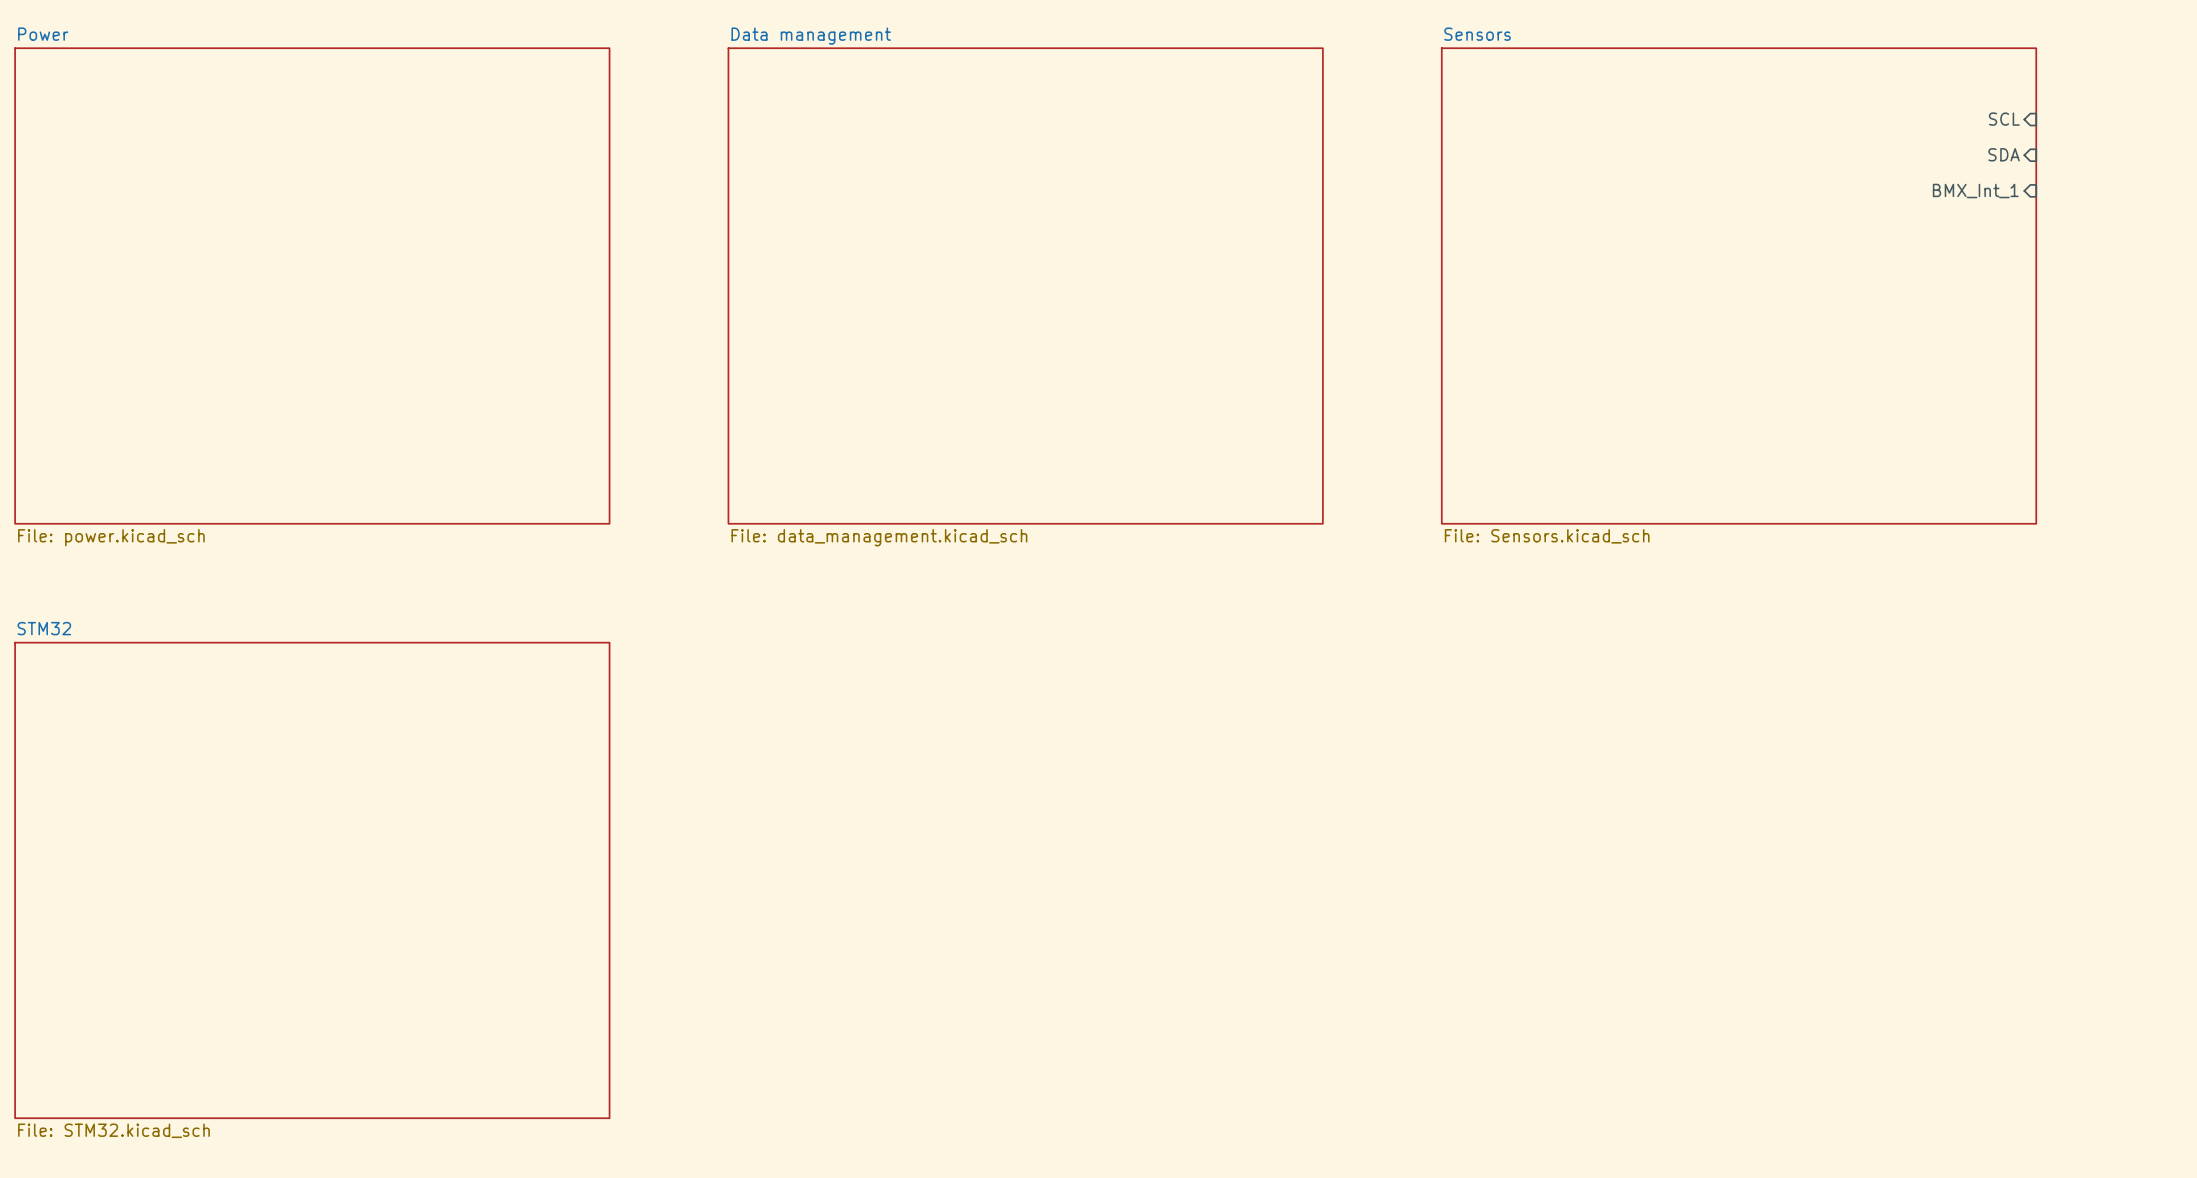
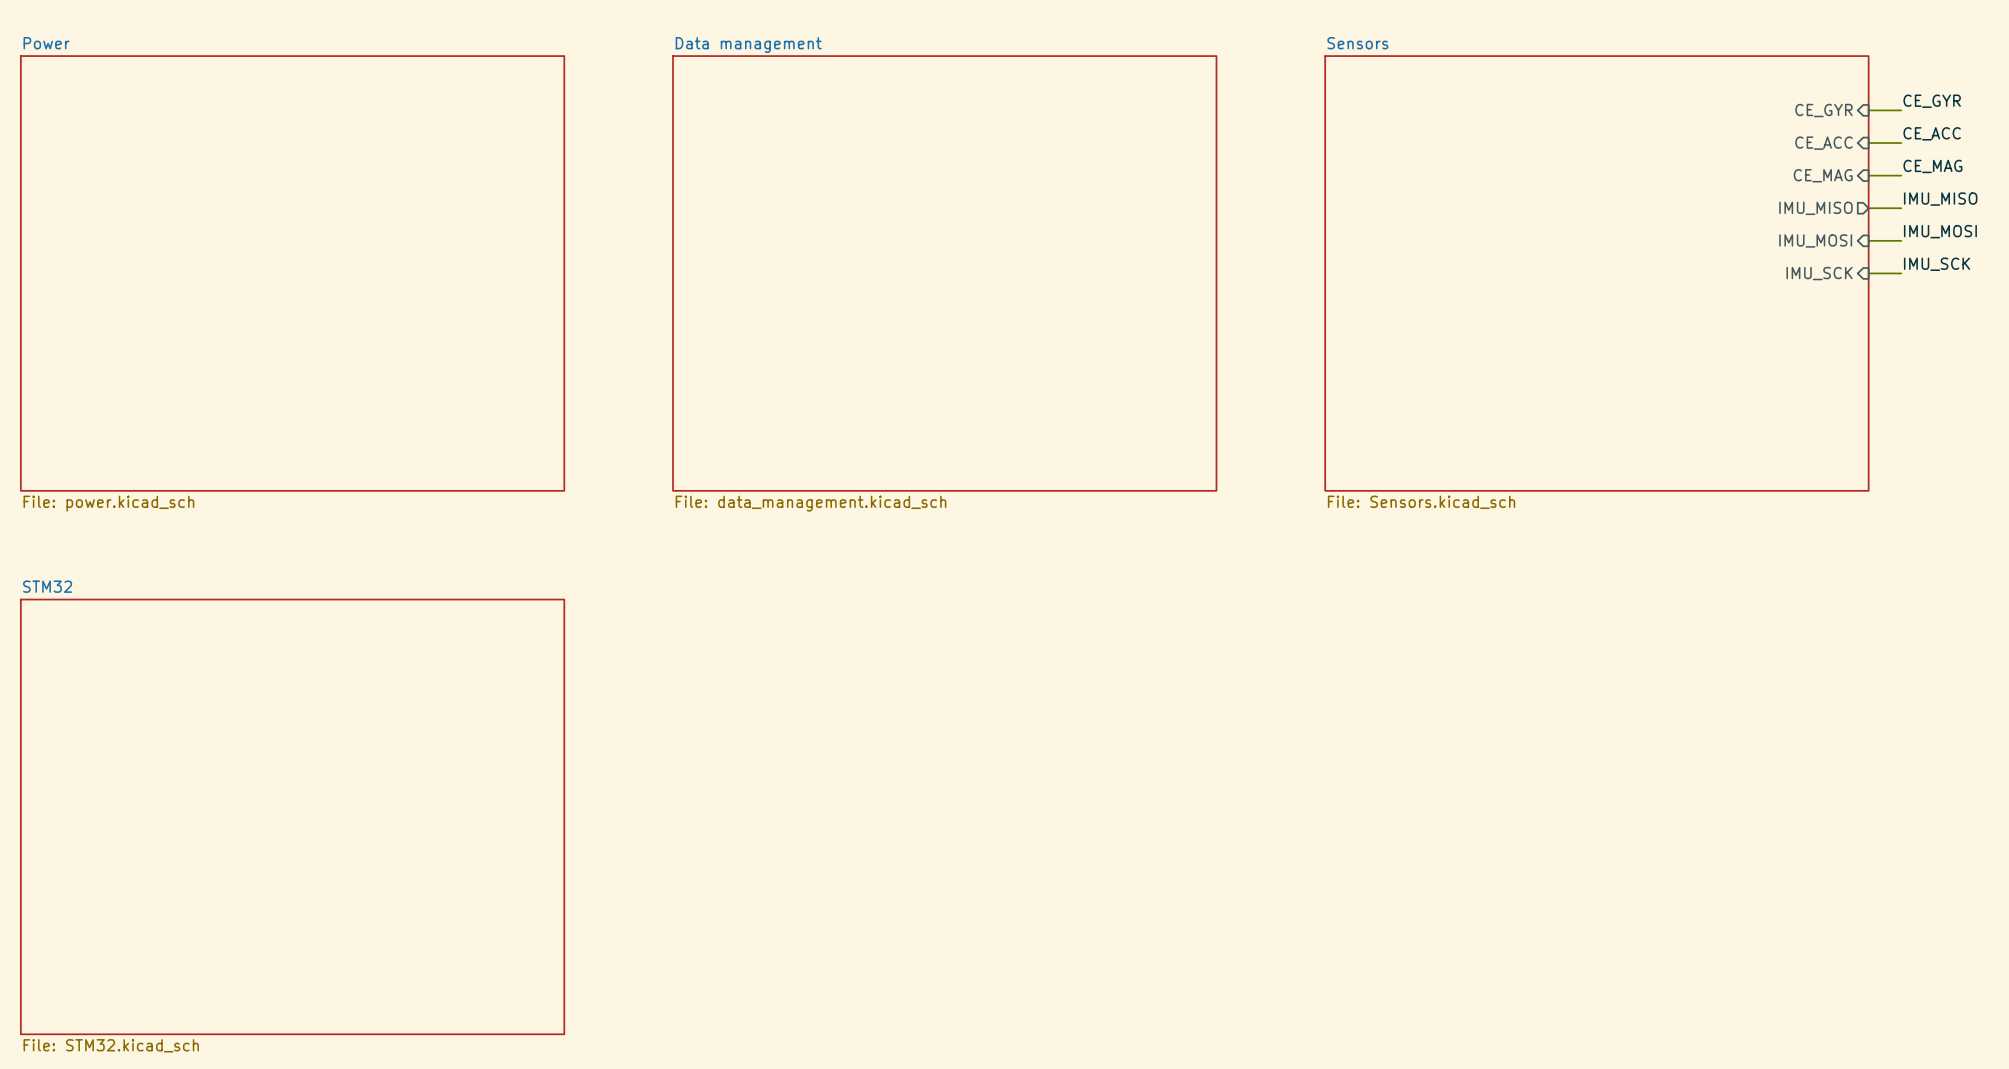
label: none -> CE_GYR (1932, 101)
sheet pin: none -> CE_GYR (1823, 110)
wire: none -> (1868, 110) (1901, 110)
sheet pin: SCL (2004, 119) -> none
label: none -> CE_ACC (1932, 133)
sheet pin: none -> CE_ACC (1823, 143)
wire: none -> (1868, 143) (1901, 143)
sheet pin: SDA (2004, 154) -> none
label: none -> CE_MAG (1932, 166)
wire: none -> (1868, 175) (1901, 175)
sheet pin: none -> CE_MAG (1823, 175)
sheet pin: BMX_Int_1 (1975, 191) -> none
label: none -> IMU_MISO (1940, 199)
sheet pin: none -> IMU_MISO (1815, 208)
wire: none -> (1868, 208) (1901, 208)
label: none -> IMU_MOSI (1940, 231)
sheet pin: none -> IMU_MOSI (1815, 240)
wire: none -> (1868, 240) (1901, 240)
label: none -> IMU_SCK (1937, 264)
wire: none -> (1868, 273) (1901, 273)
sheet pin: none -> IMU_SCK (1819, 273)

